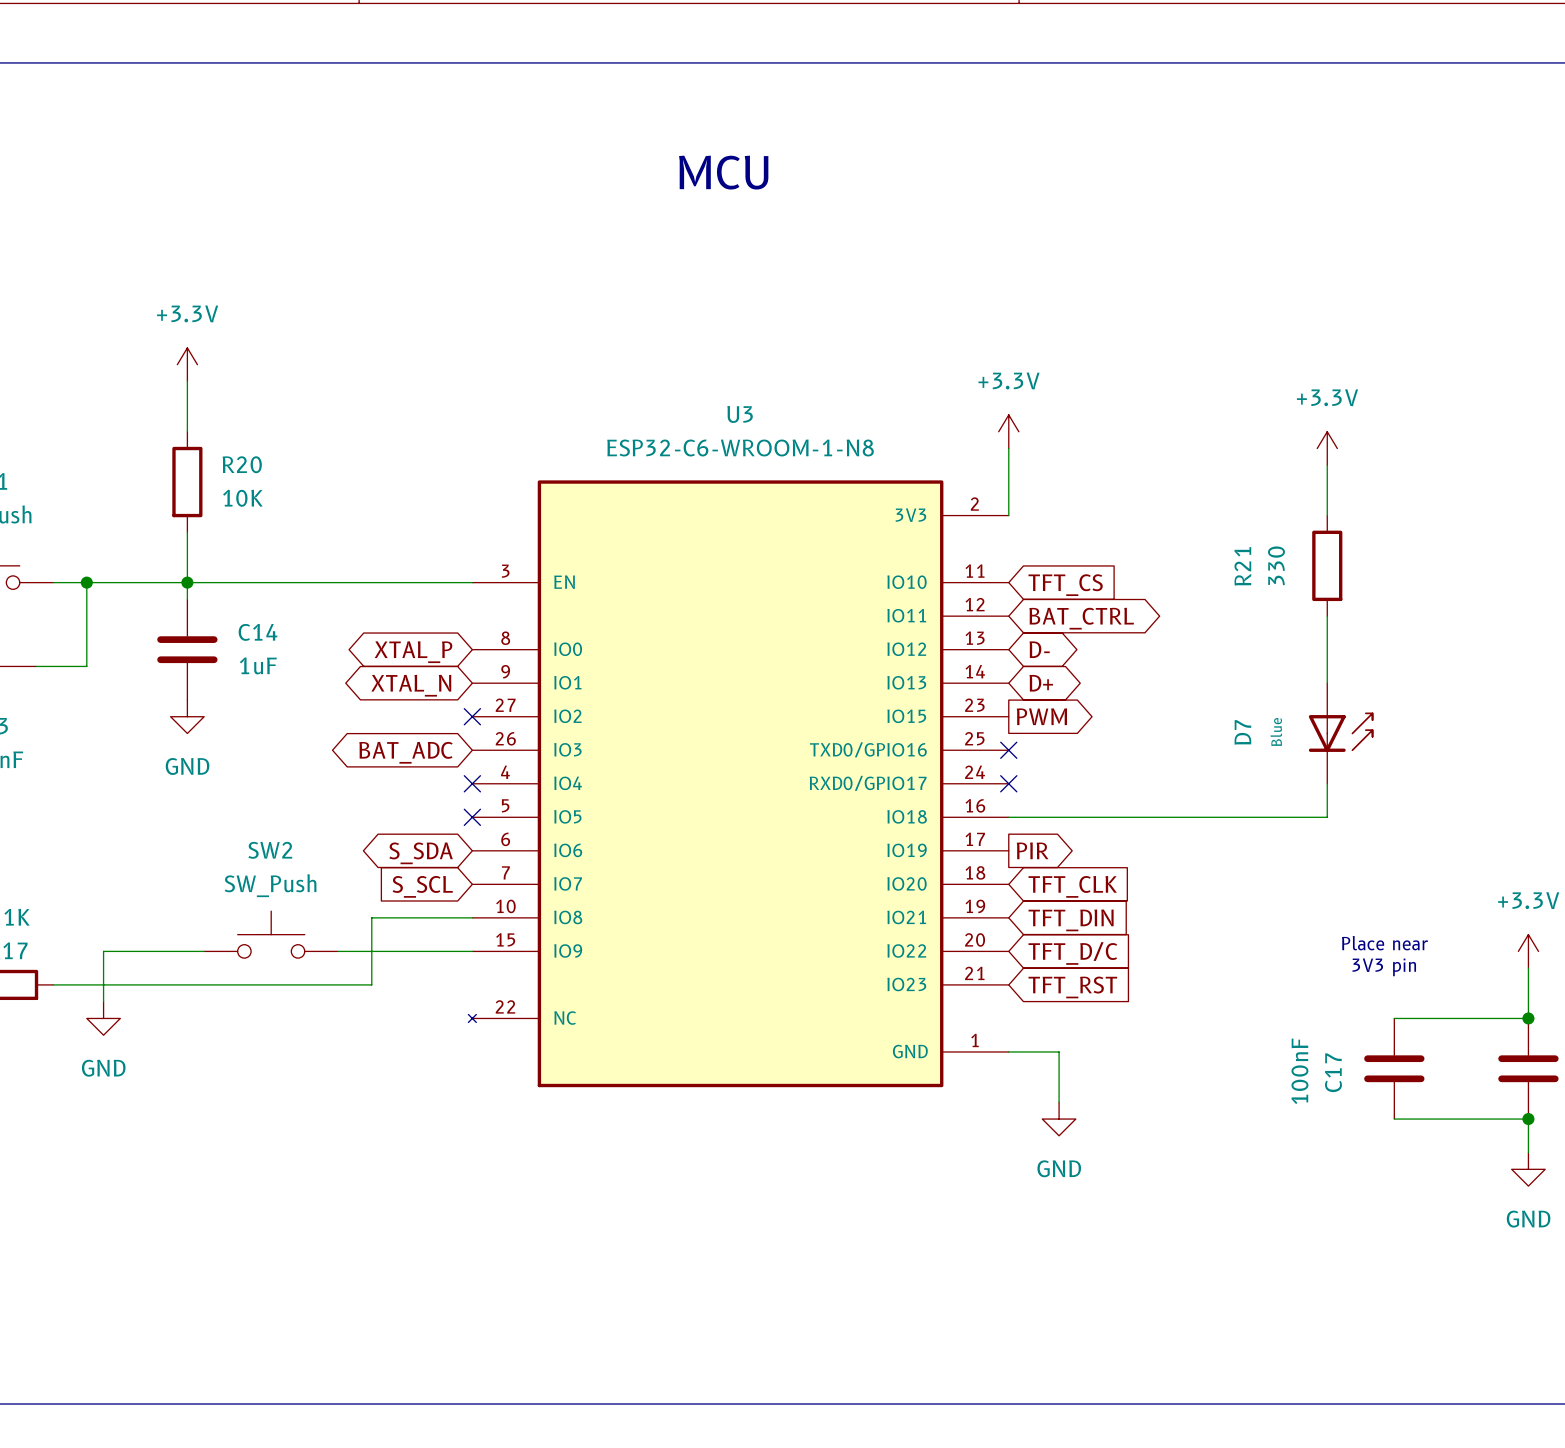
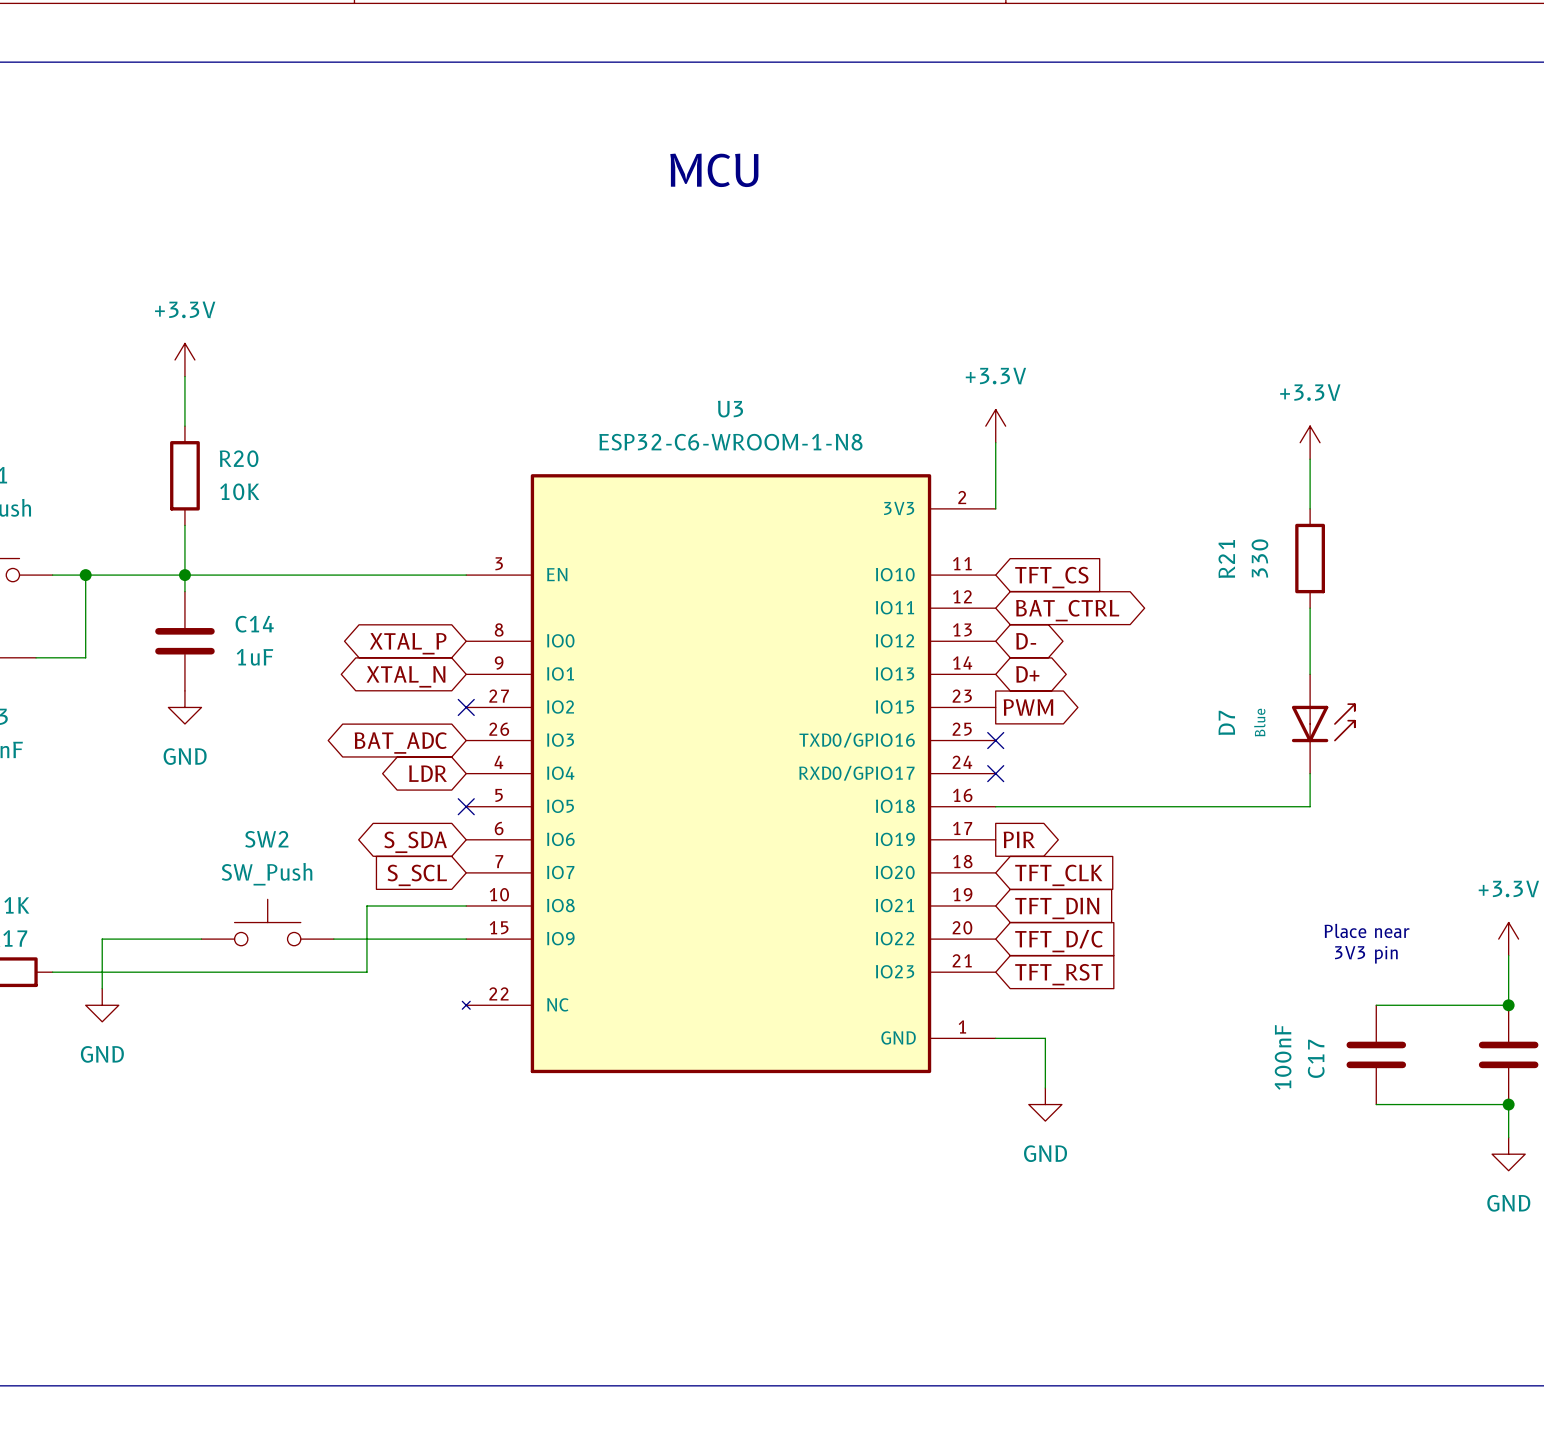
global label: none -> LDR (428, 773)
no-connect mark: (472, 783) -> none

